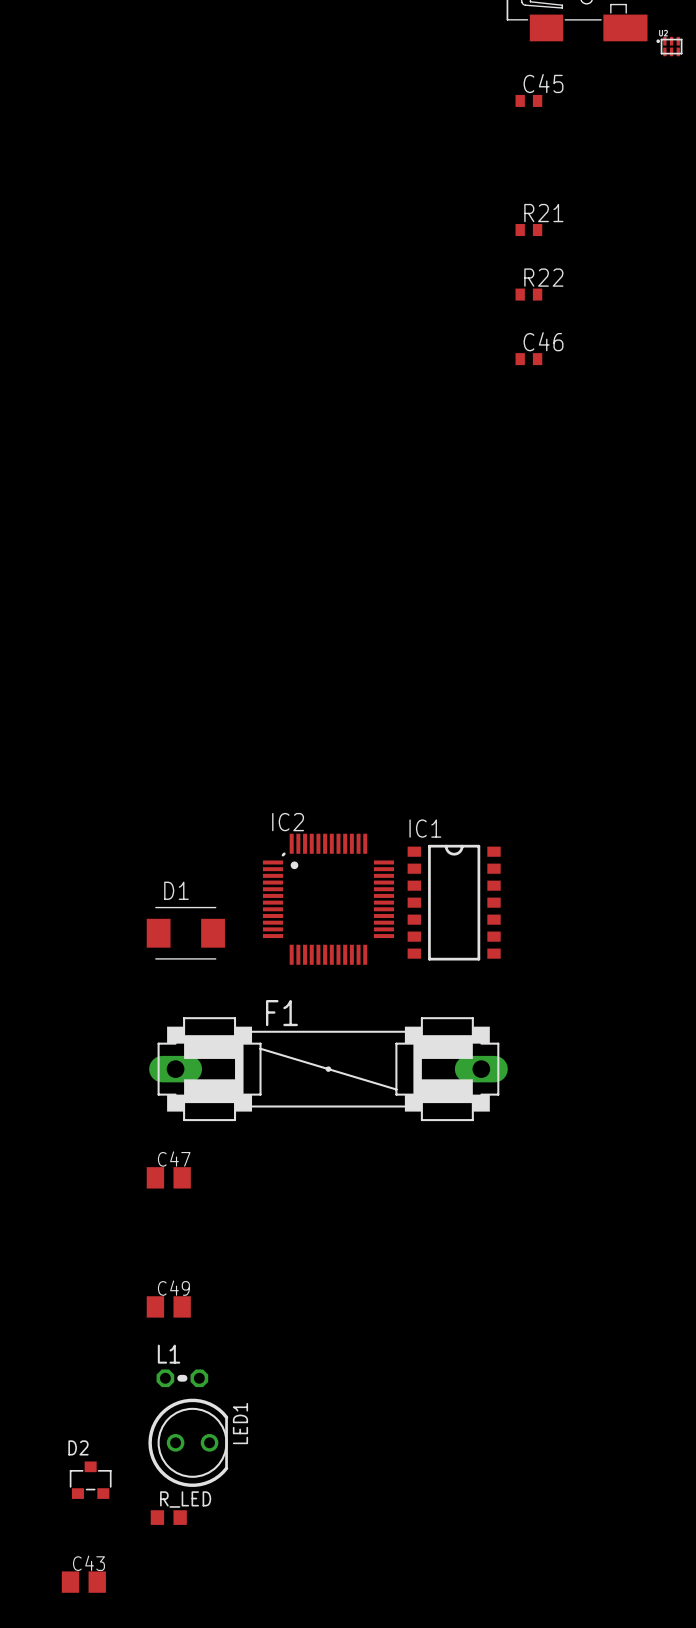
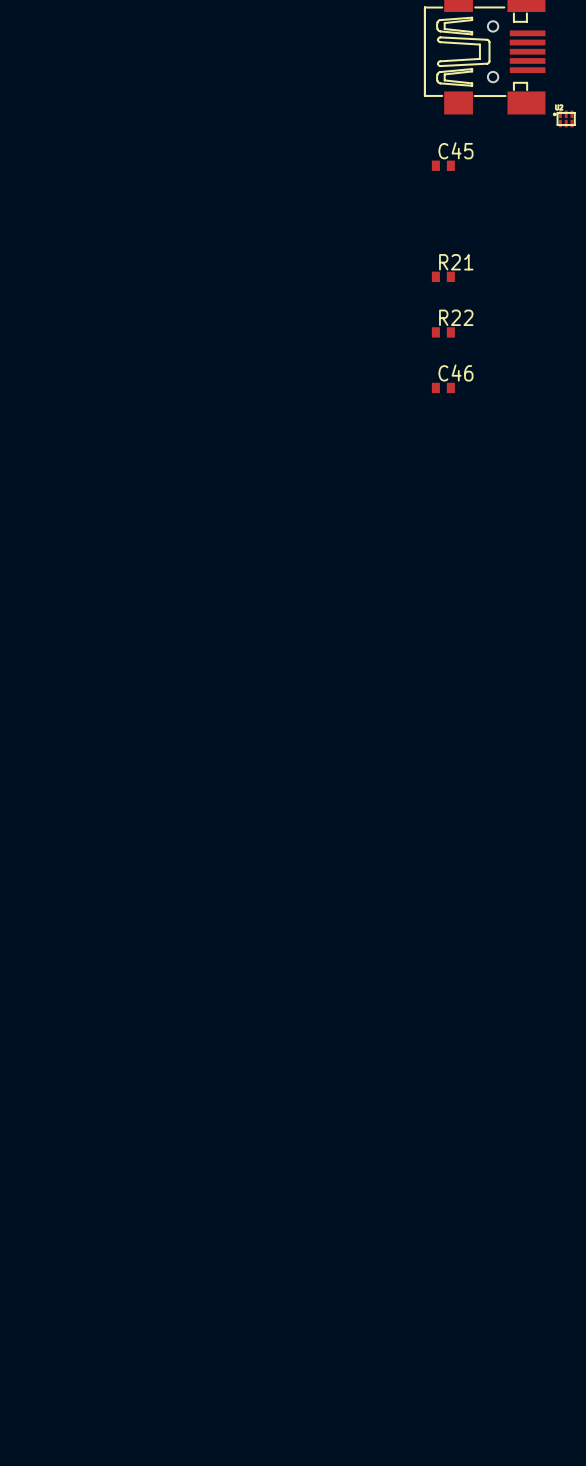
IC2: (328, 899) -> none
IC1: (454, 902) -> none
D1: (185, 933) -> none
F1: (328, 1069) -> none
C47: (168, 1177) -> none
C49: (168, 1306) -> none
L1: (182, 1378) -> none
LED1: (188, 1442) -> none
D2: (90, 1480) -> none
R_LED: (168, 1517) -> none
C43: (83, 1582) -> none

